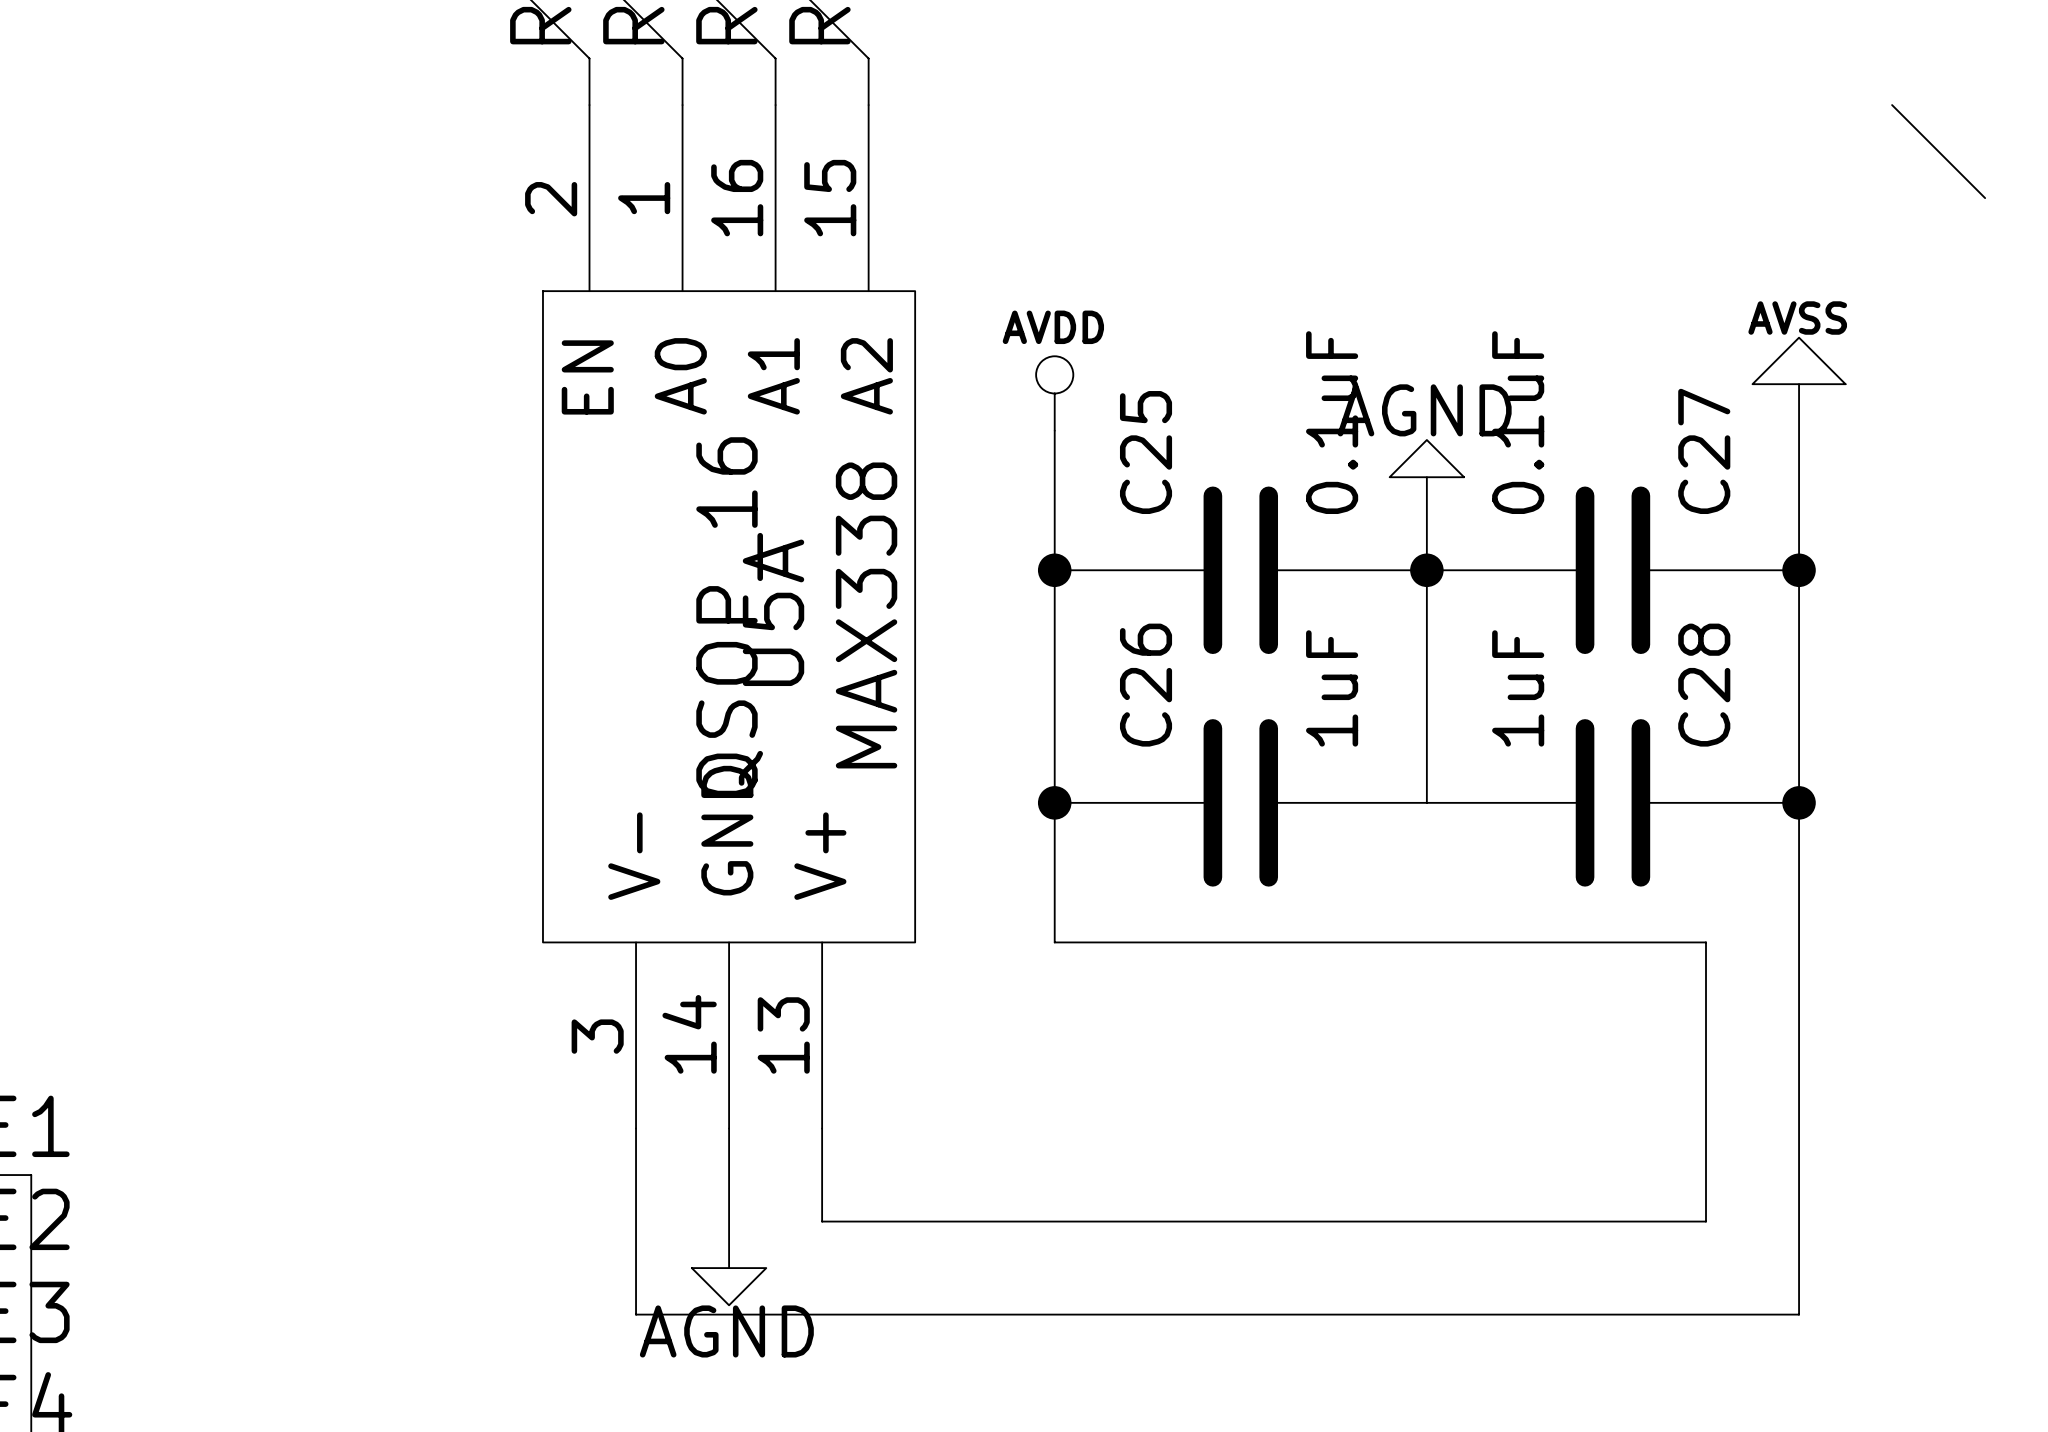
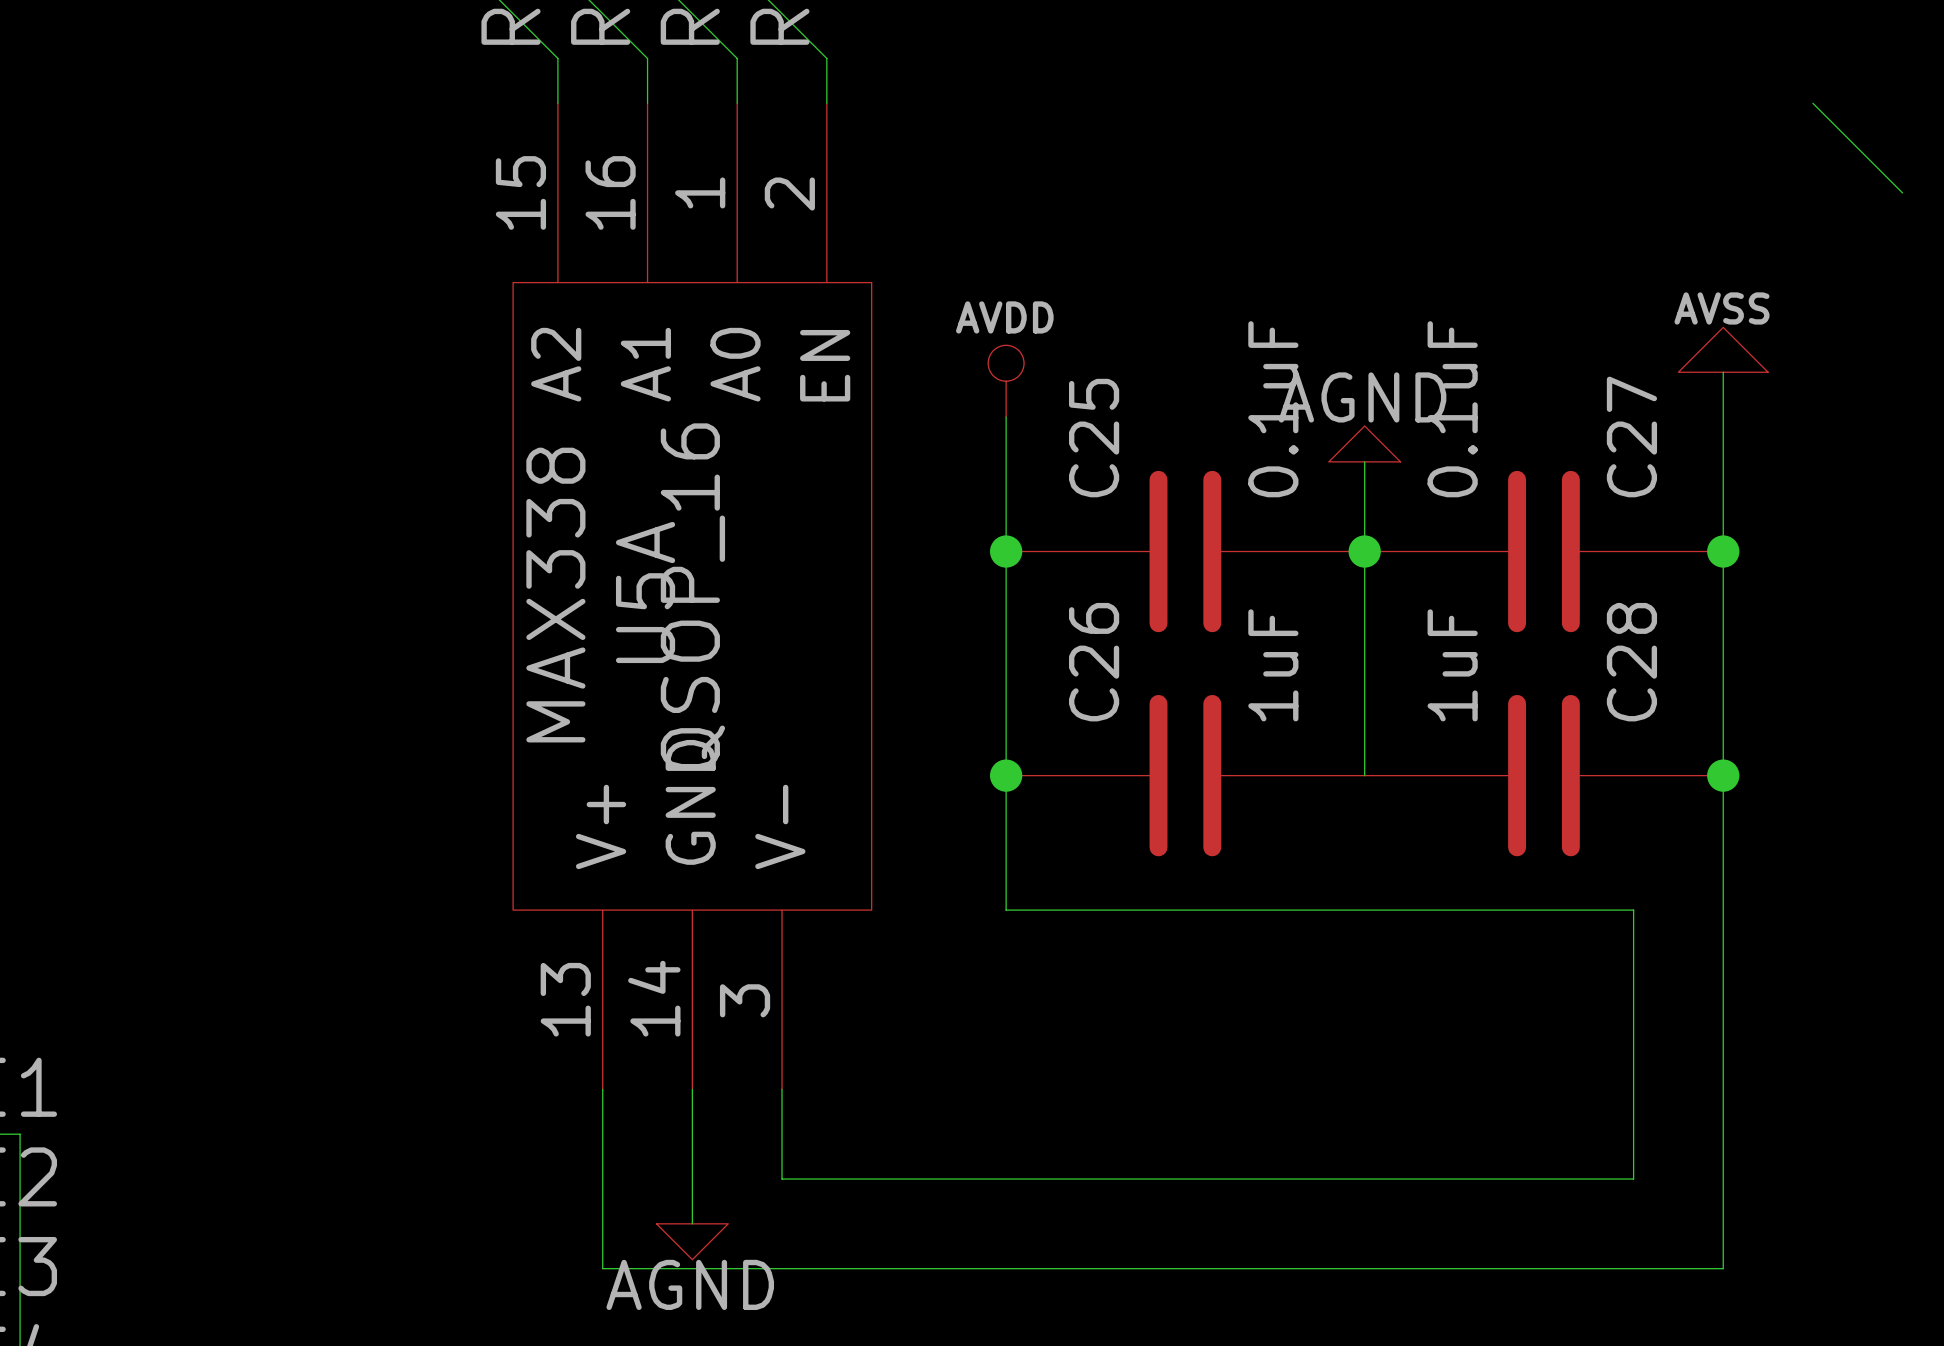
U5A flip: as is (729, 616) -> left-right (692, 596)

